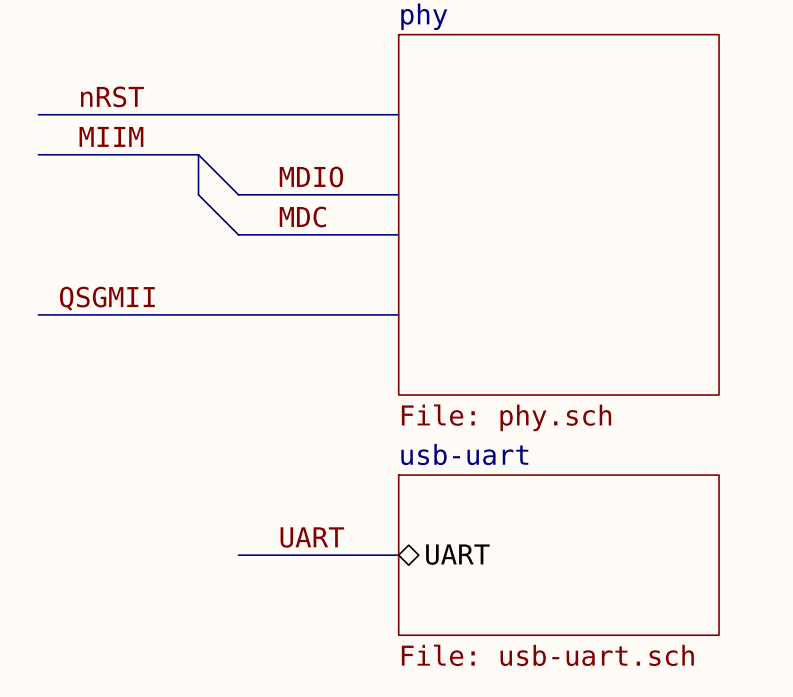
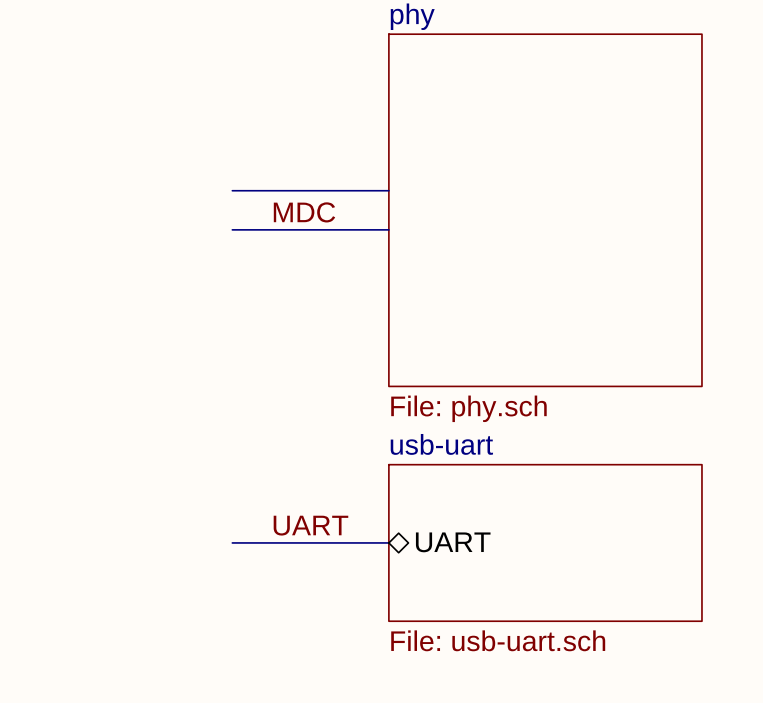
label: nRST (112, 96) -> none
wire: (38, 114) (398, 114) -> none
label: MIIM (111, 136) -> none
bus: (38, 154) (198, 154) (198, 194) -> none
wire: (198, 154) (238, 194) -> none
label: MDIO (311, 176) -> none
wire: (198, 194) (238, 234) -> none
label: QSGMII (107, 298) -> none
bus: (38, 314) (398, 314) -> none

